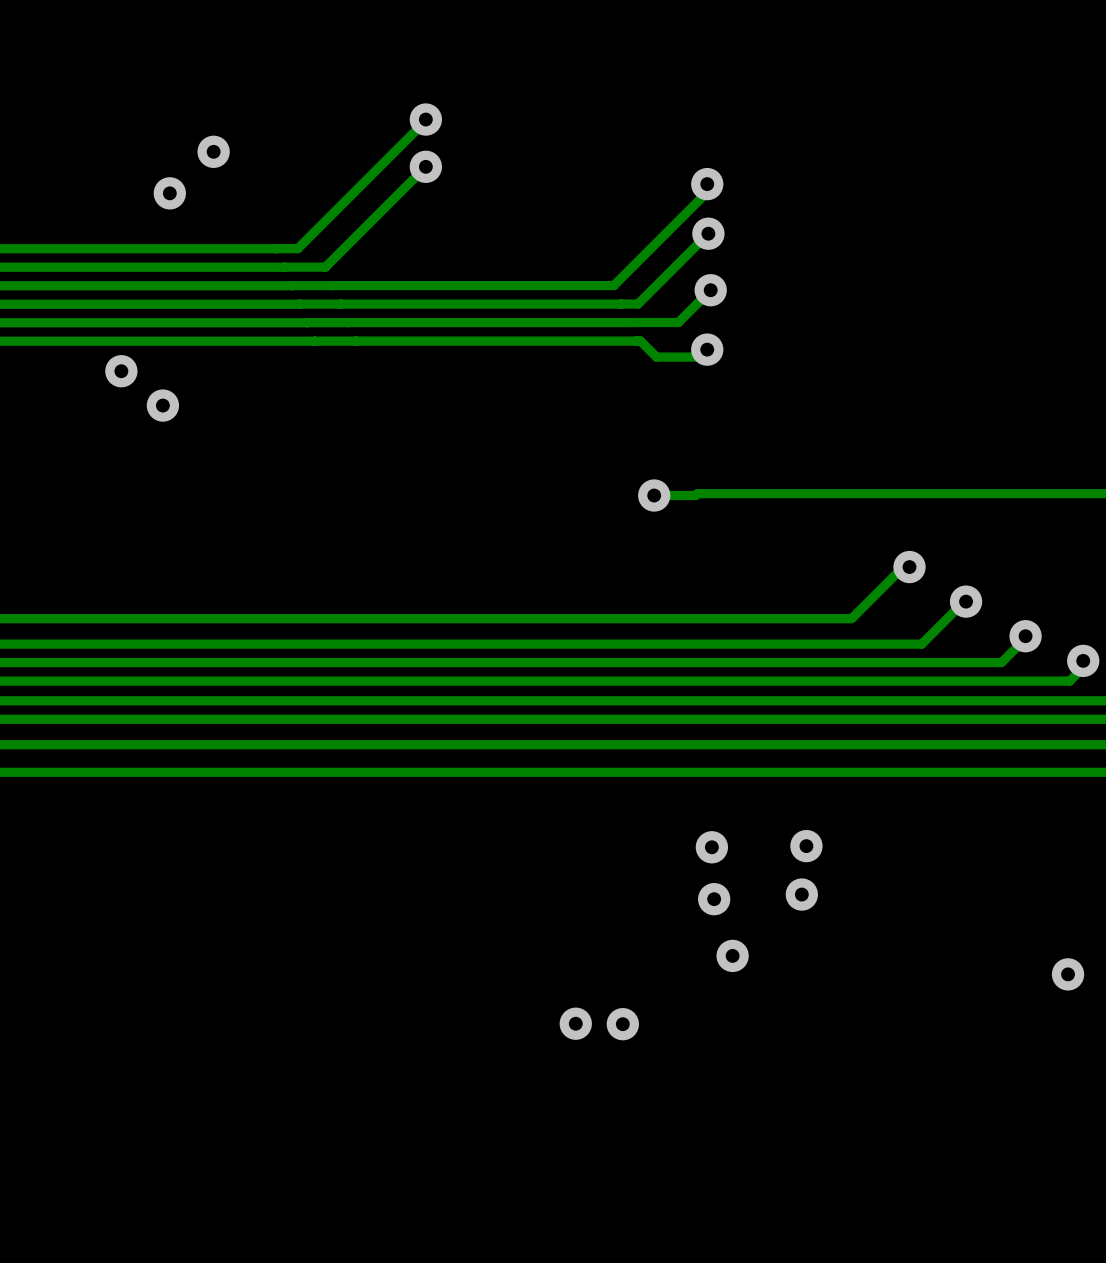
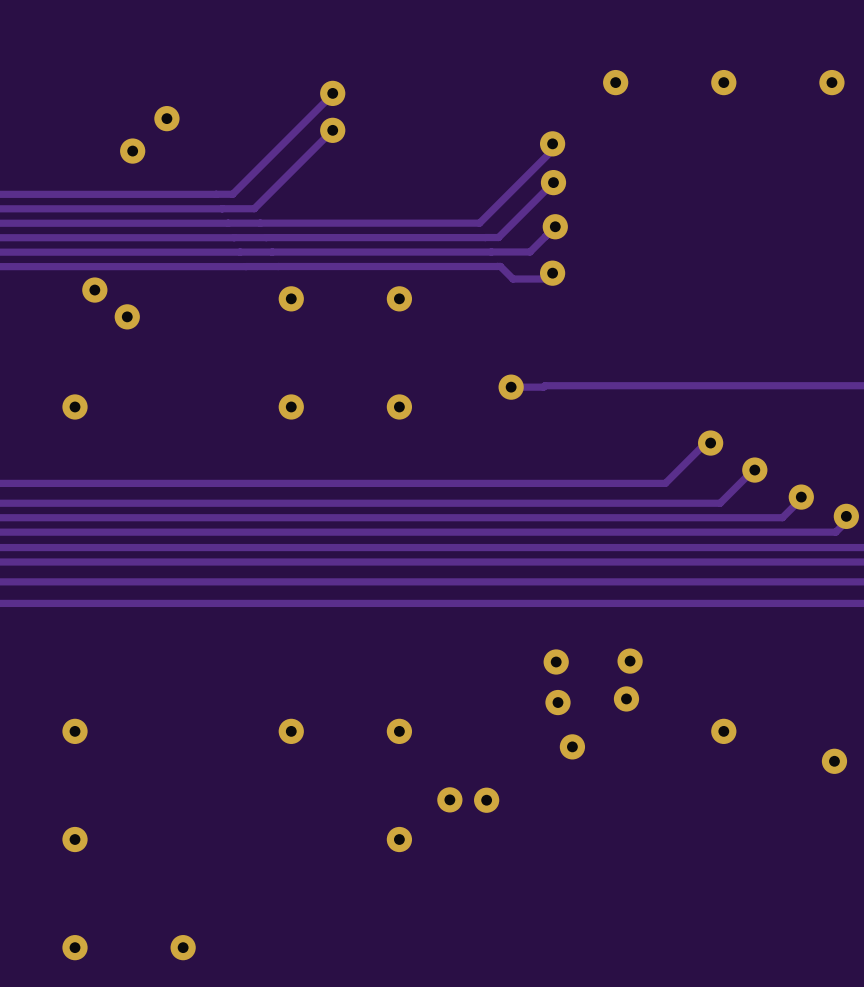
via: none -> (615, 82)
via: none -> (723, 82)
via: none -> (831, 82)
via: none -> (291, 298)
via: none -> (399, 298)
via: none -> (75, 406)
via: none -> (291, 406)
via: none -> (399, 406)
via: none -> (75, 731)
via: none -> (291, 731)
via: none -> (399, 731)
via: none -> (723, 731)
via: none -> (75, 839)
via: none -> (399, 839)
via: none -> (75, 947)
via: none -> (183, 947)

